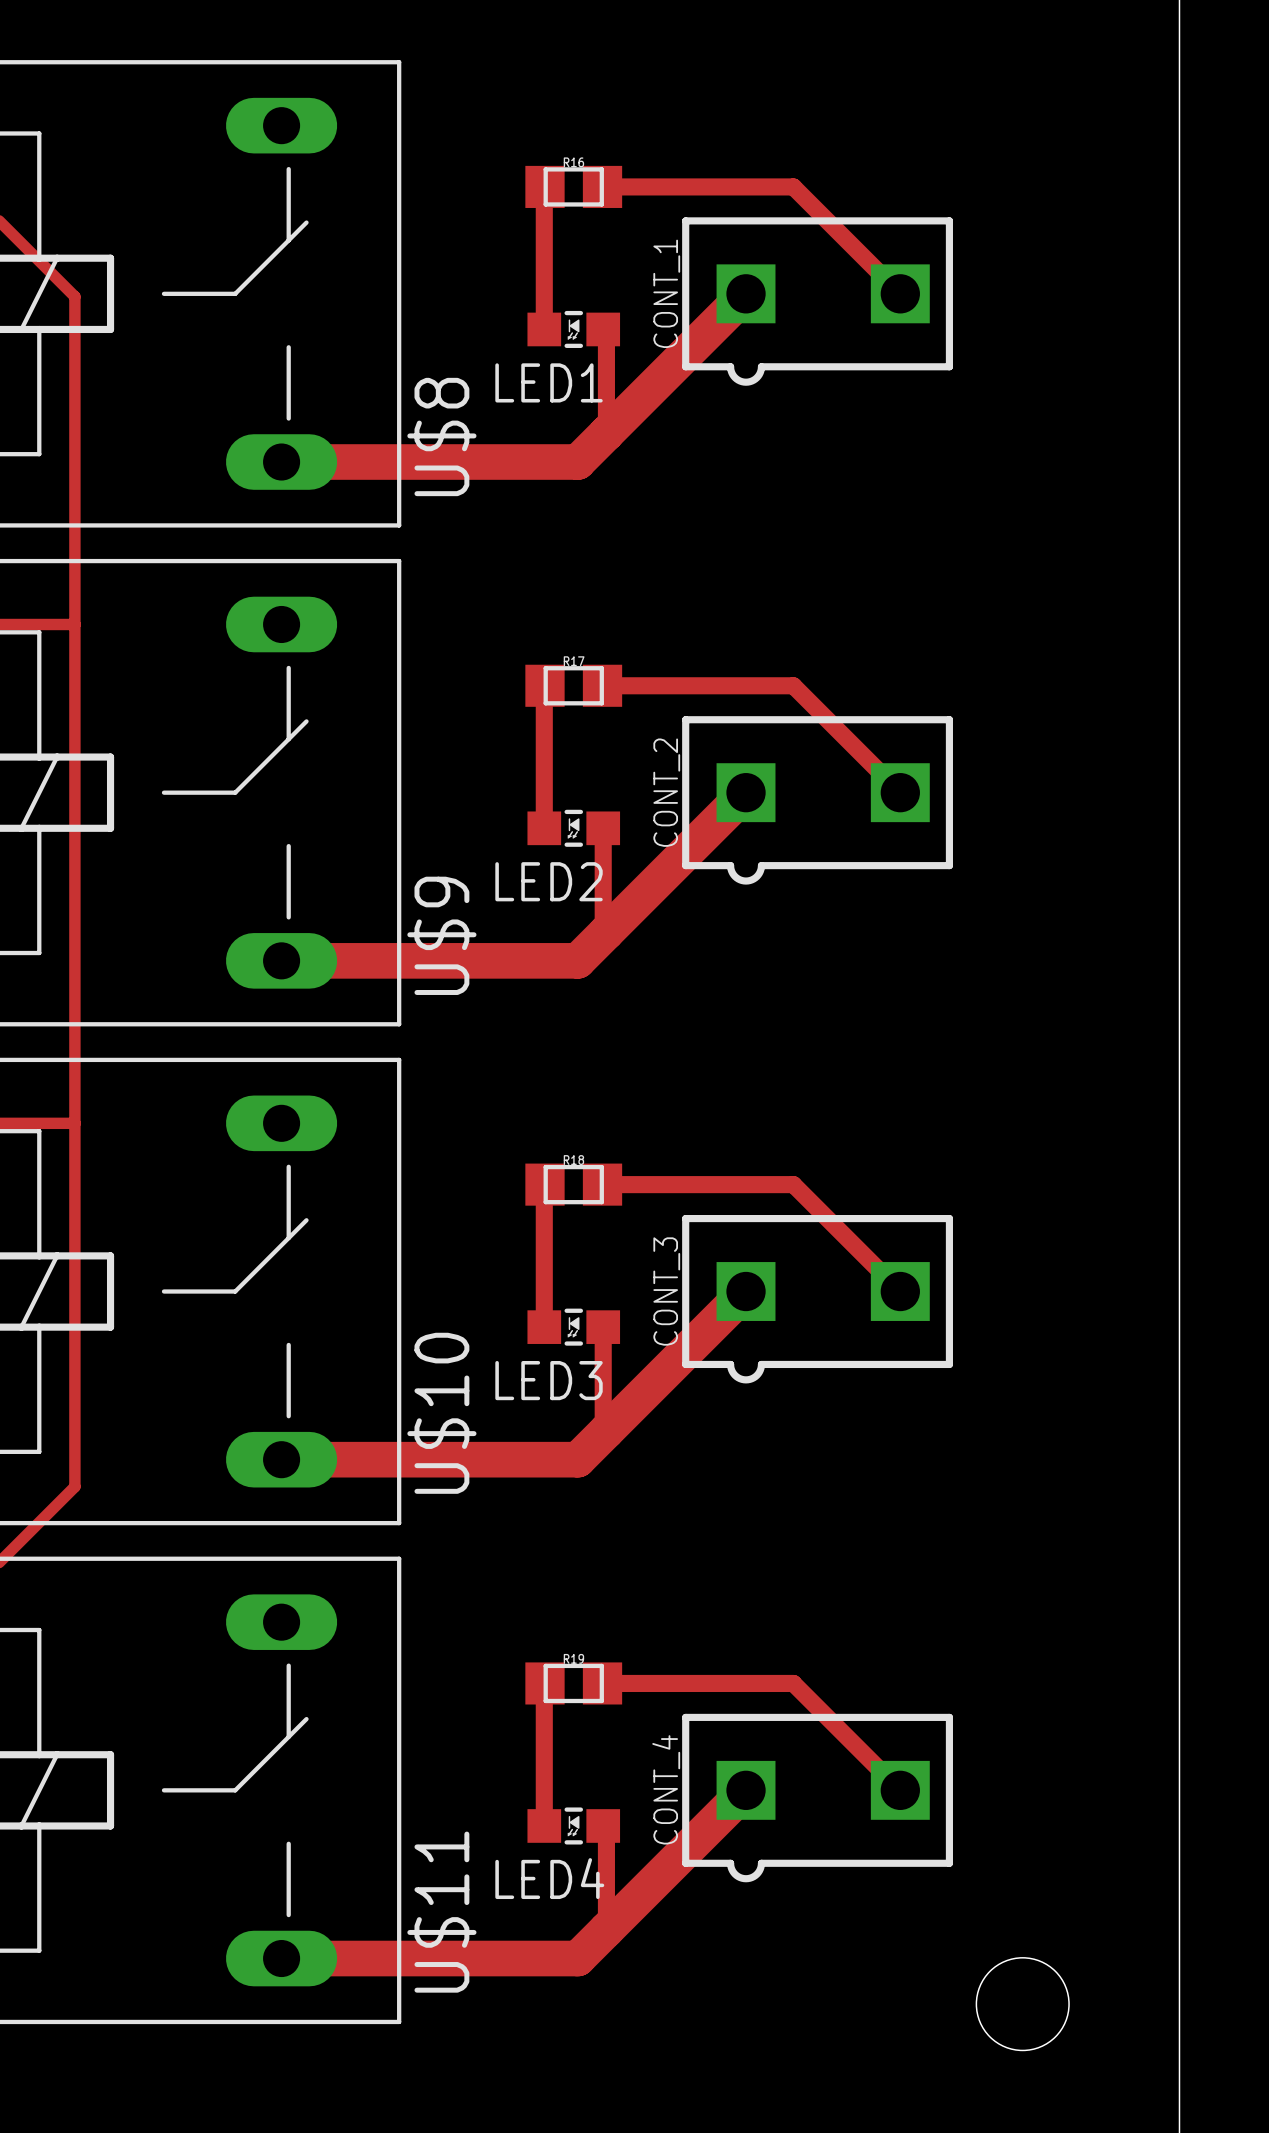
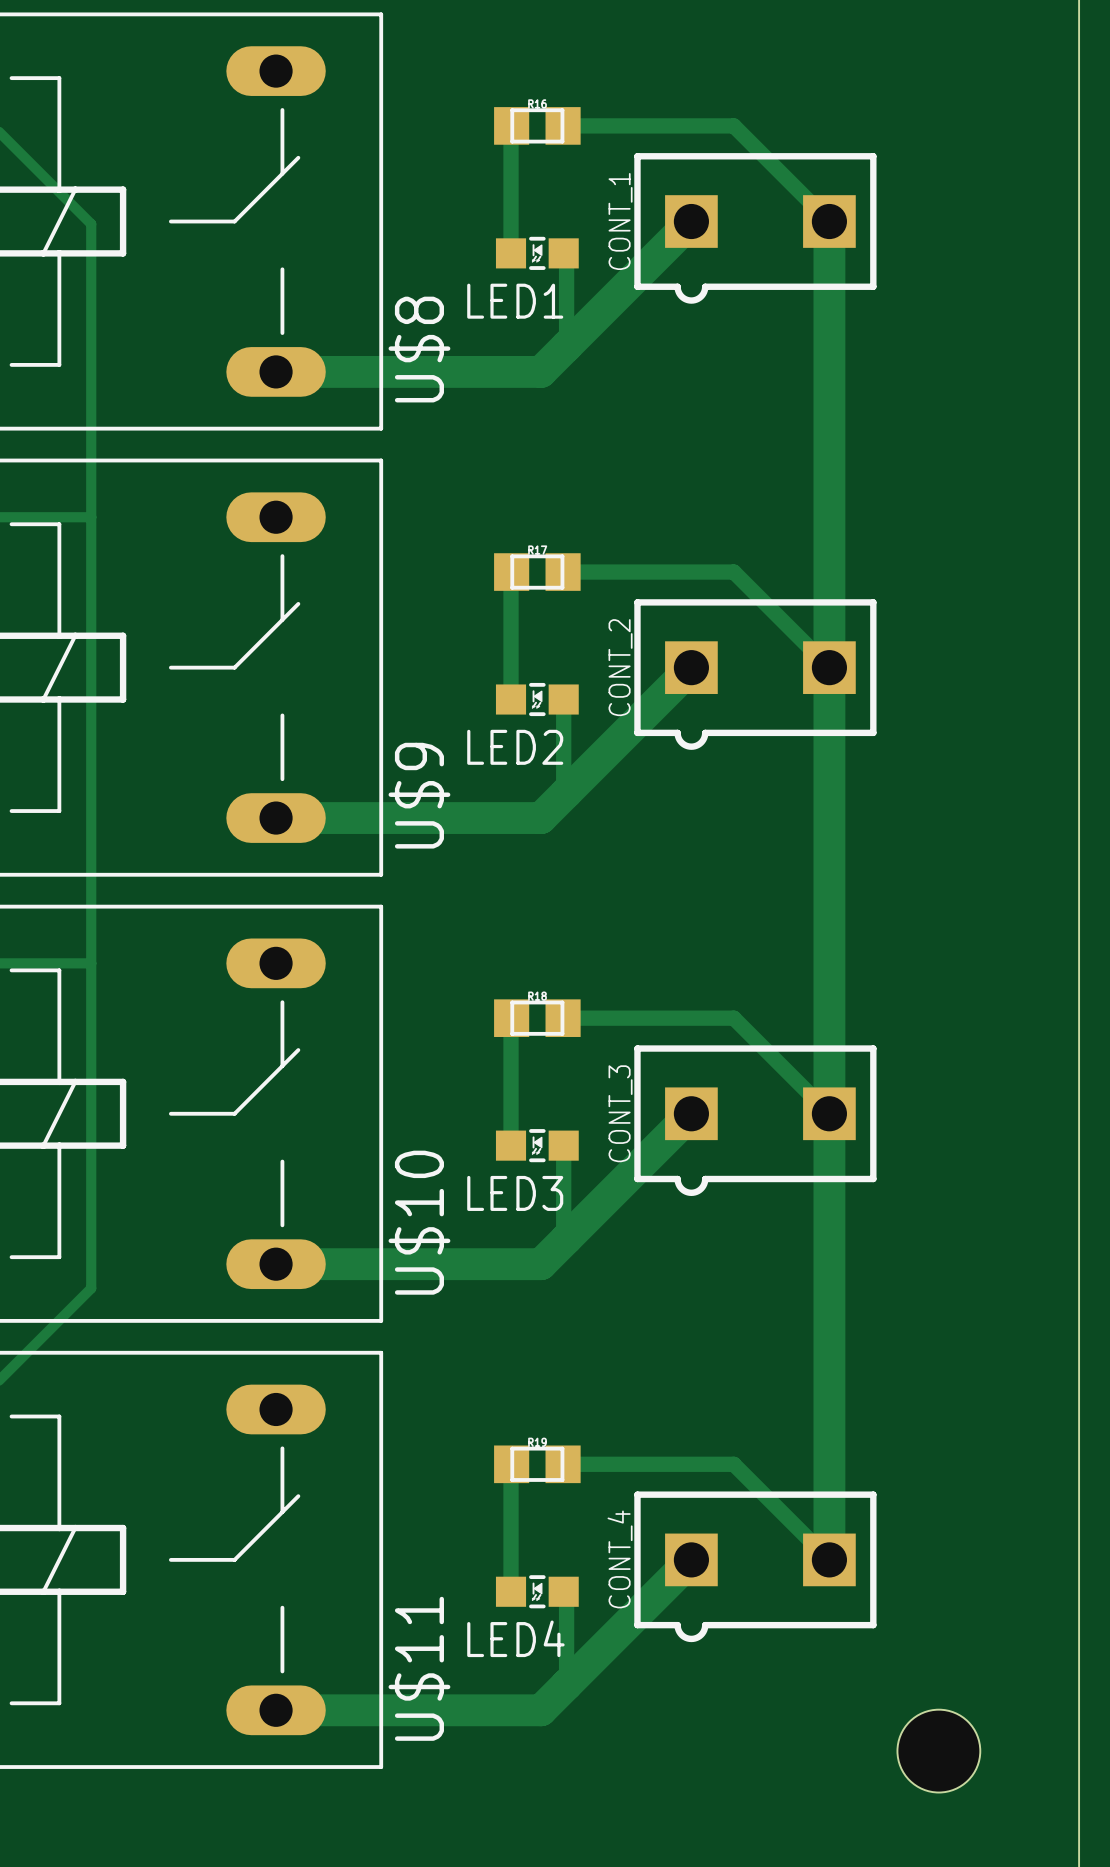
track: none -> (829, 221) (829, 1559)

